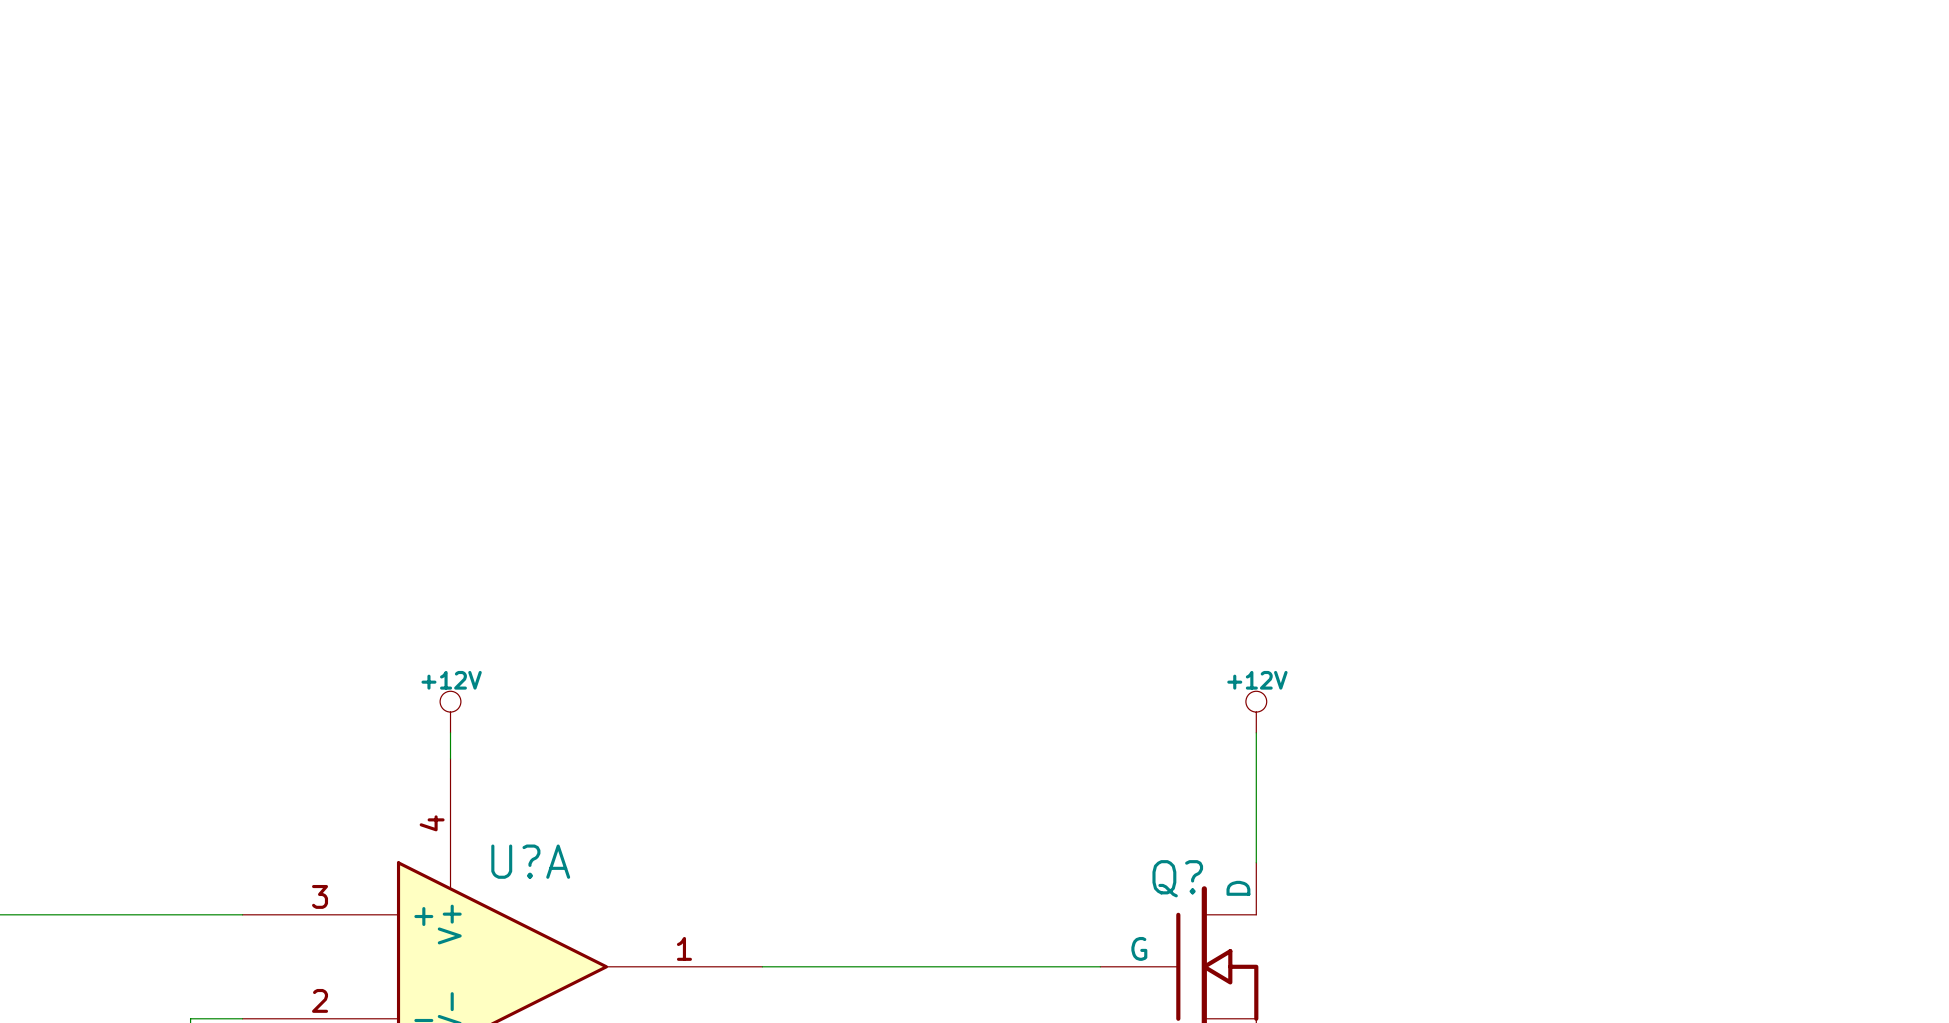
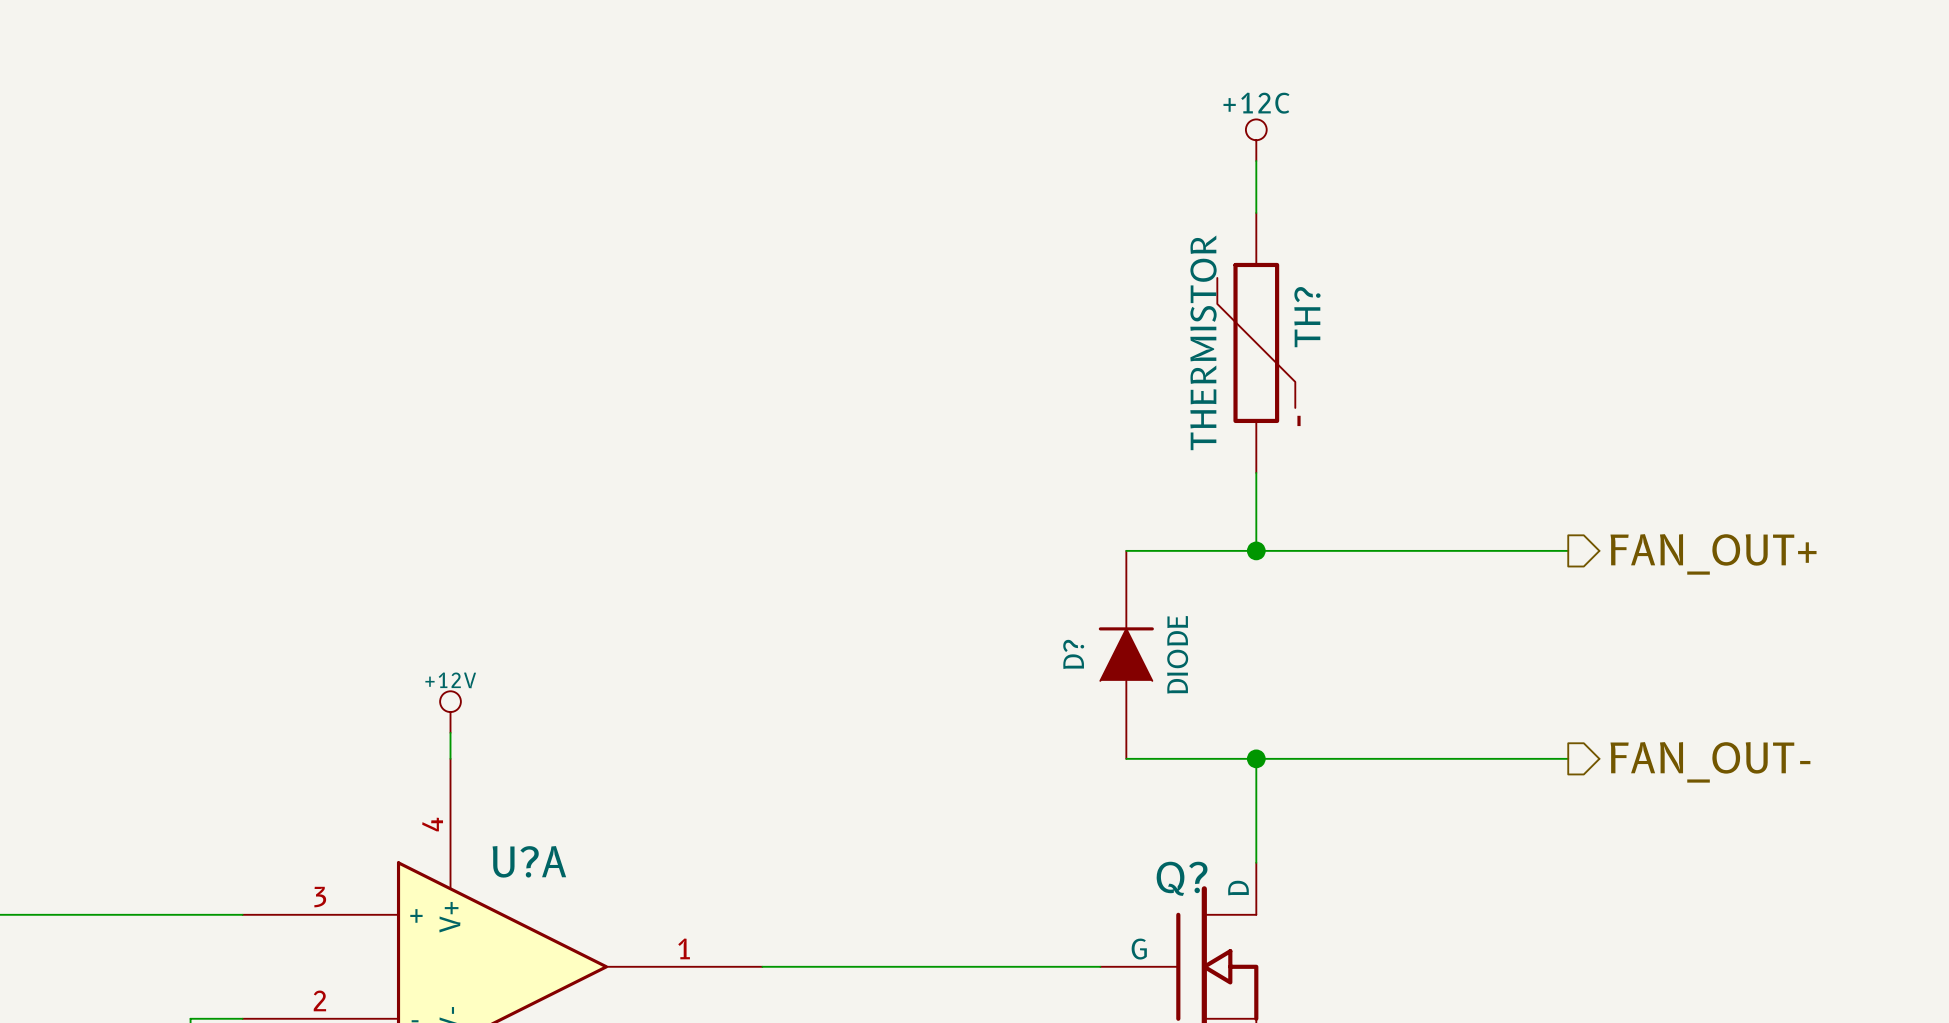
power symbol: none -> +12C (1256, 140)
wire: none -> (1256, 161) (1256, 212)
TH?: none -> THERMISTOR (1256, 342)
wire: none -> (1256, 472) (1256, 550)
wire: none -> (1126, 550) (1568, 550)
junction: none -> (1256, 550)
hierarchical label: none -> FAN_OUT+ (1713, 554)
D?: none -> DIODE (1126, 654)
power symbol: +12V (1256, 712) -> none
wire: (1256, 732) (1256, 758) -> none
wire: none -> (1126, 758) (1568, 758)
junction: none -> (1256, 758)
hierarchical label: none -> FAN_OUT- (1710, 762)

